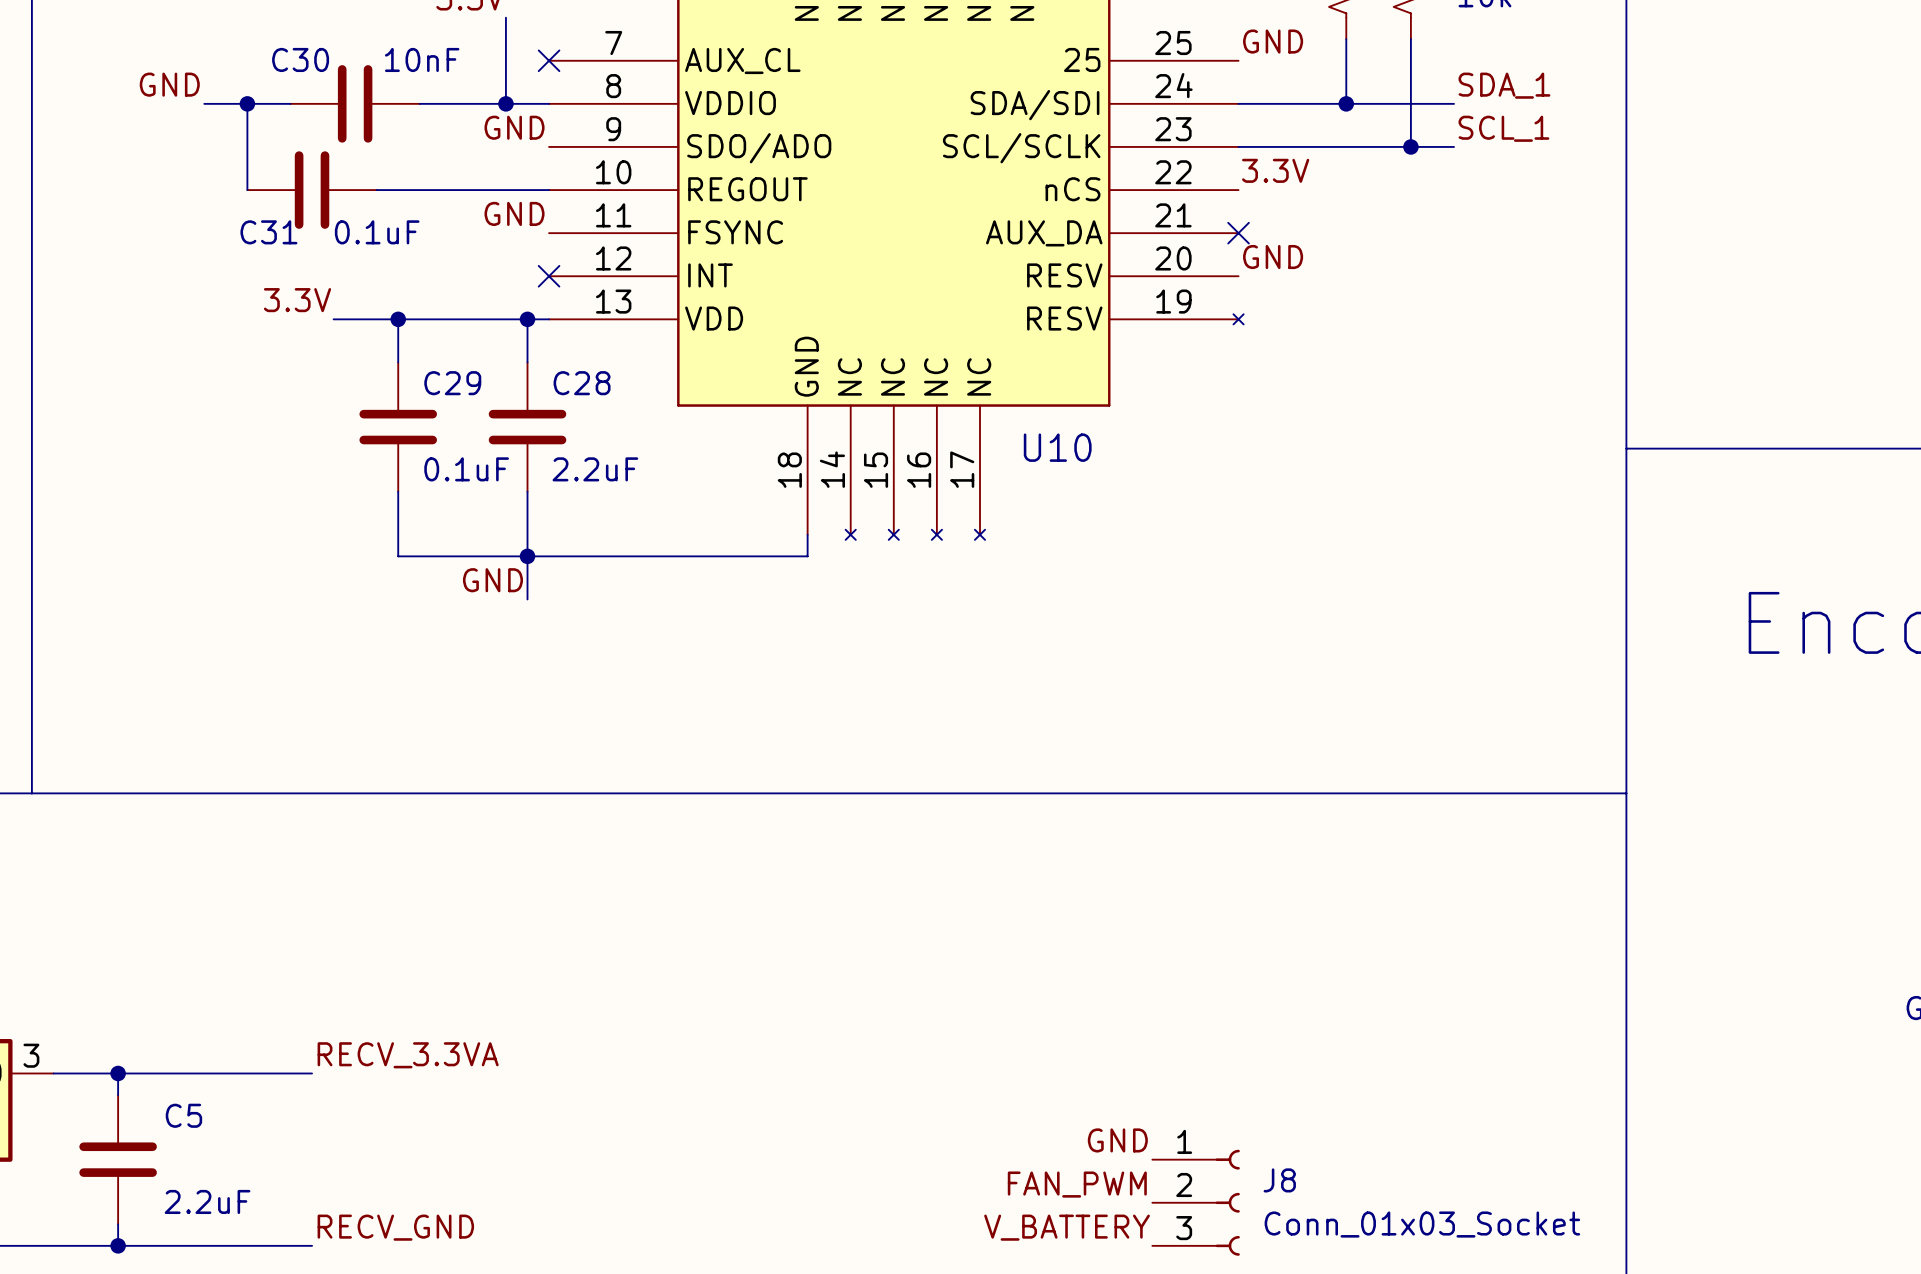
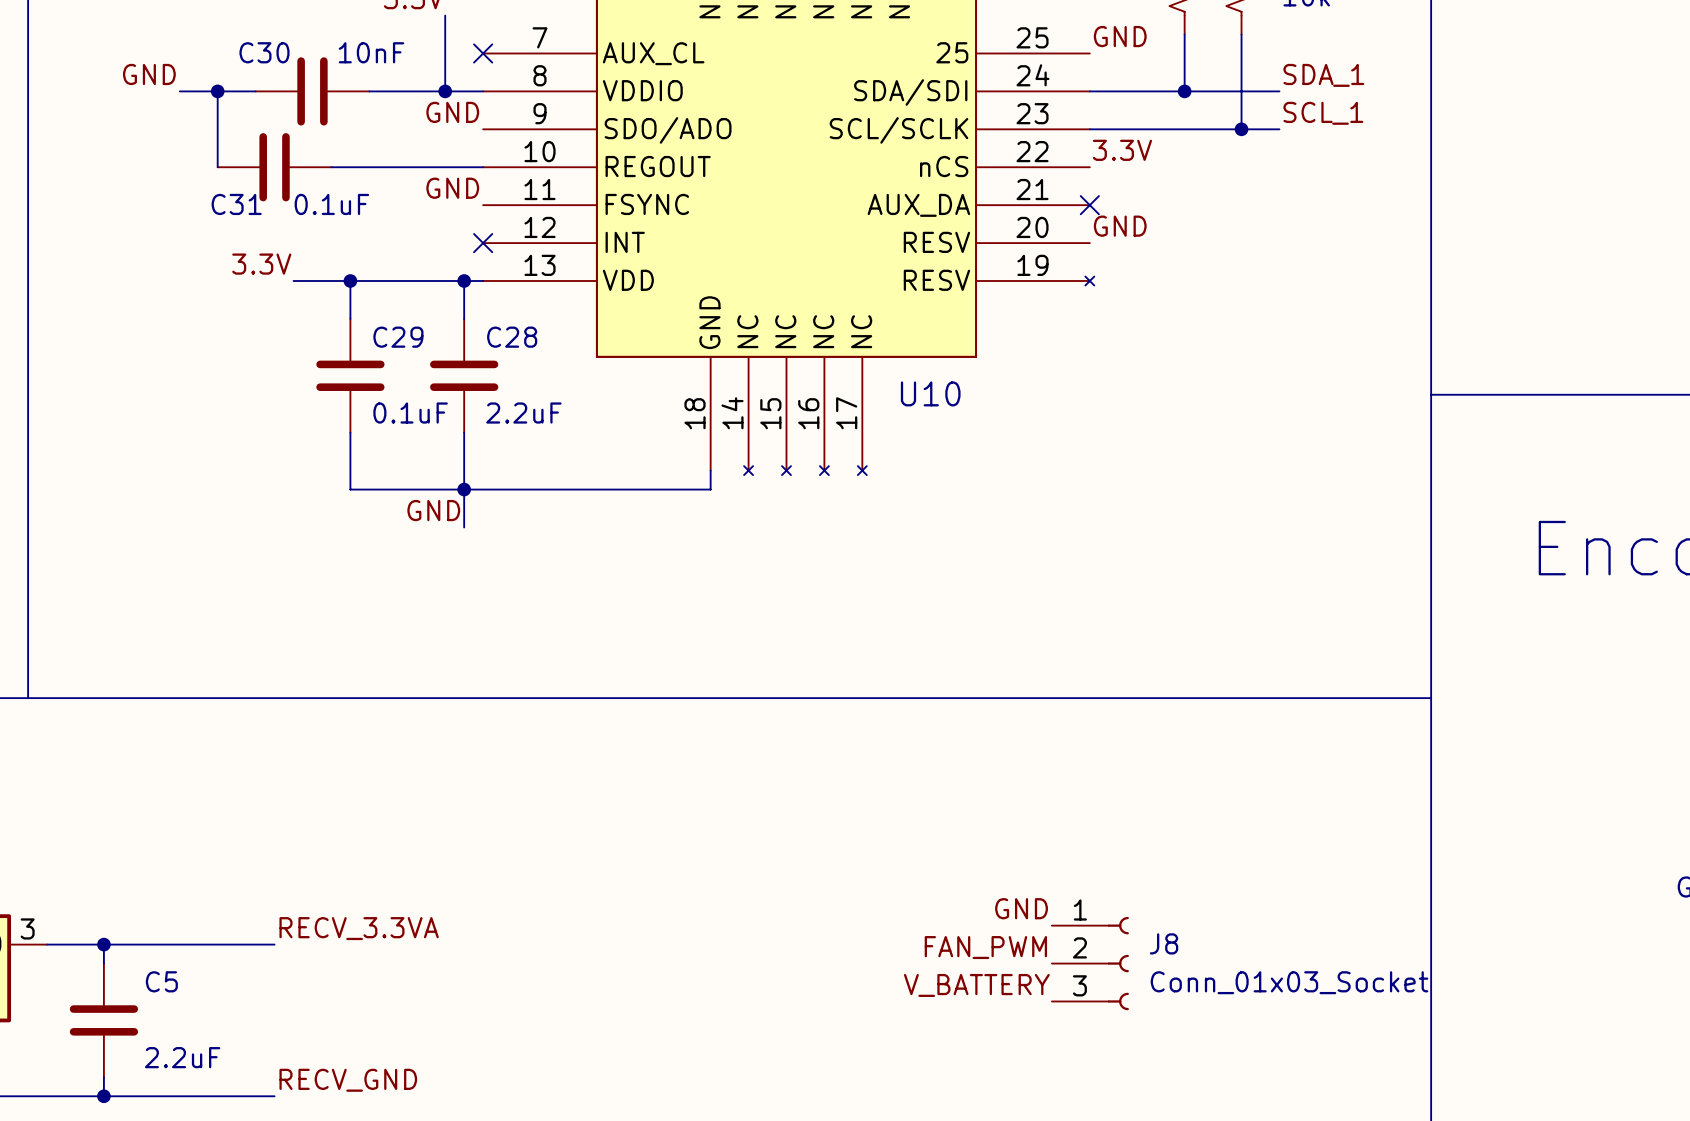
label position: GND (1117, 1140) -> GND (1021, 908)
label position: FAN_PWM (1077, 1184) -> FAN_PWM (985, 947)
J8 position: (1196, 1202) -> (1090, 963)
label position: V_BATTERY (1067, 1227) -> V_BATTERY (976, 985)

